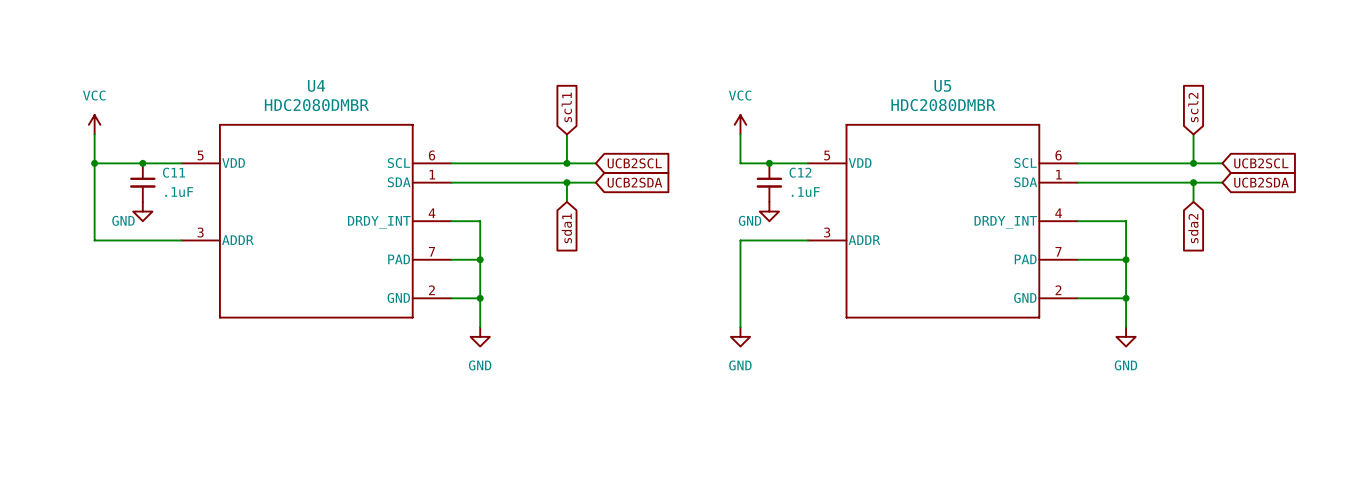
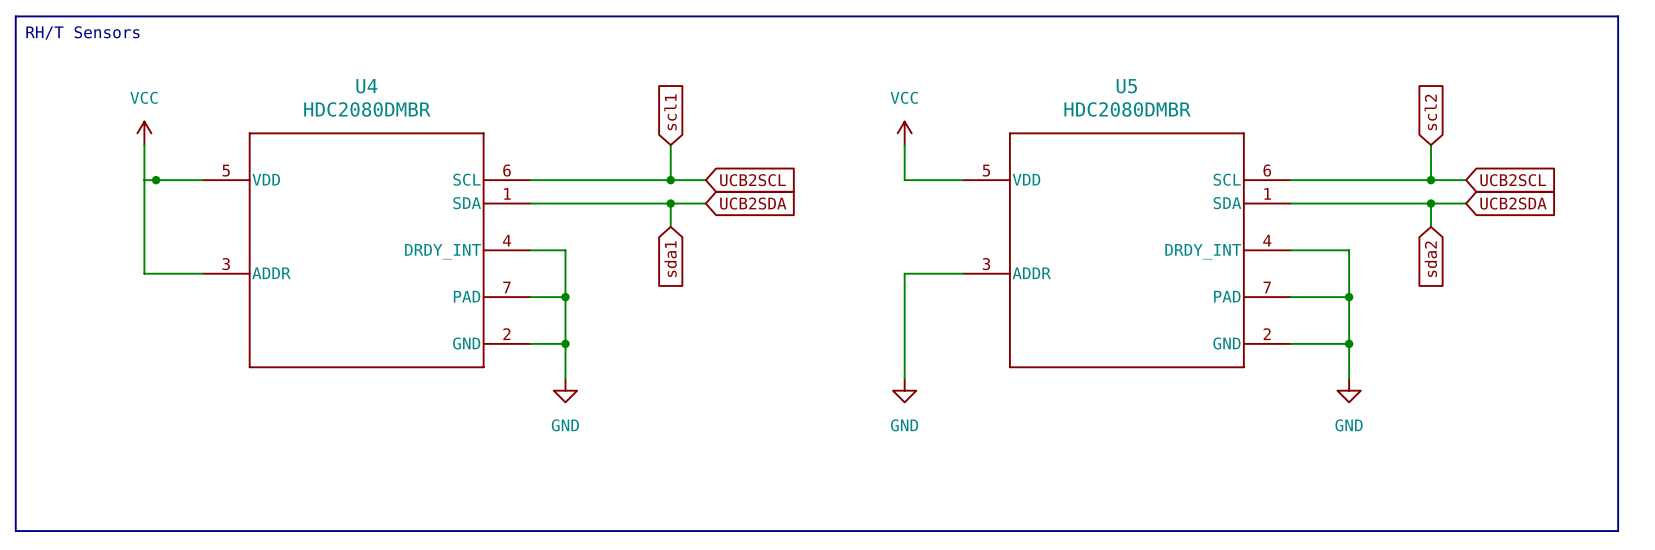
line: none -> (15, 16) (1618, 16) (1618, 531) (15, 531) (15, 16)
text: none -> RH/T Sensors (82, 32)
power symbol position: VCC (94, 124) -> VCC (144, 133)
power symbol position: VCC (740, 124) -> VCC (904, 133)
wire: (94, 134) (94, 240) (133, 240) -> (144, 145) (144, 273)
wire: (740, 134) (740, 163) (759, 163) -> (904, 145) (904, 180)
wire: (94, 163) (133, 163) -> none
junction: (94, 163) -> none
junction: (769, 163) -> none
C11: .1uF (142, 182) -> none
C12: .1uF (769, 182) -> none
power symbol: GND (142, 211) -> none
power symbol: GND (769, 211) -> none
wire: (759, 240) (740, 240) (740, 327) -> (904, 273) (904, 378)
power symbol position: GND (740, 336) -> GND (904, 390)

